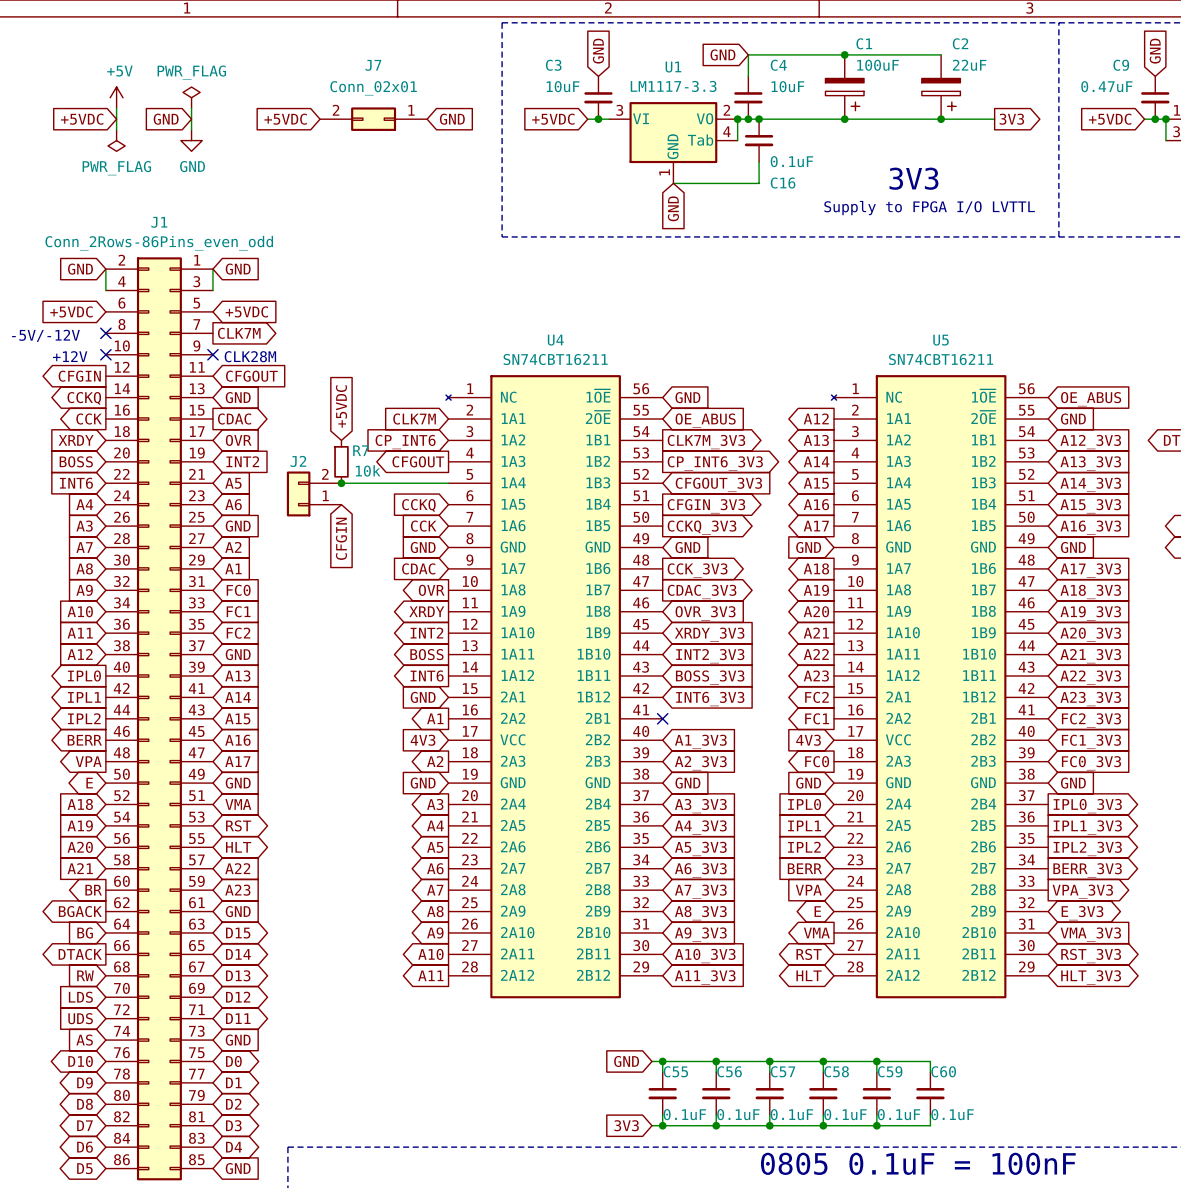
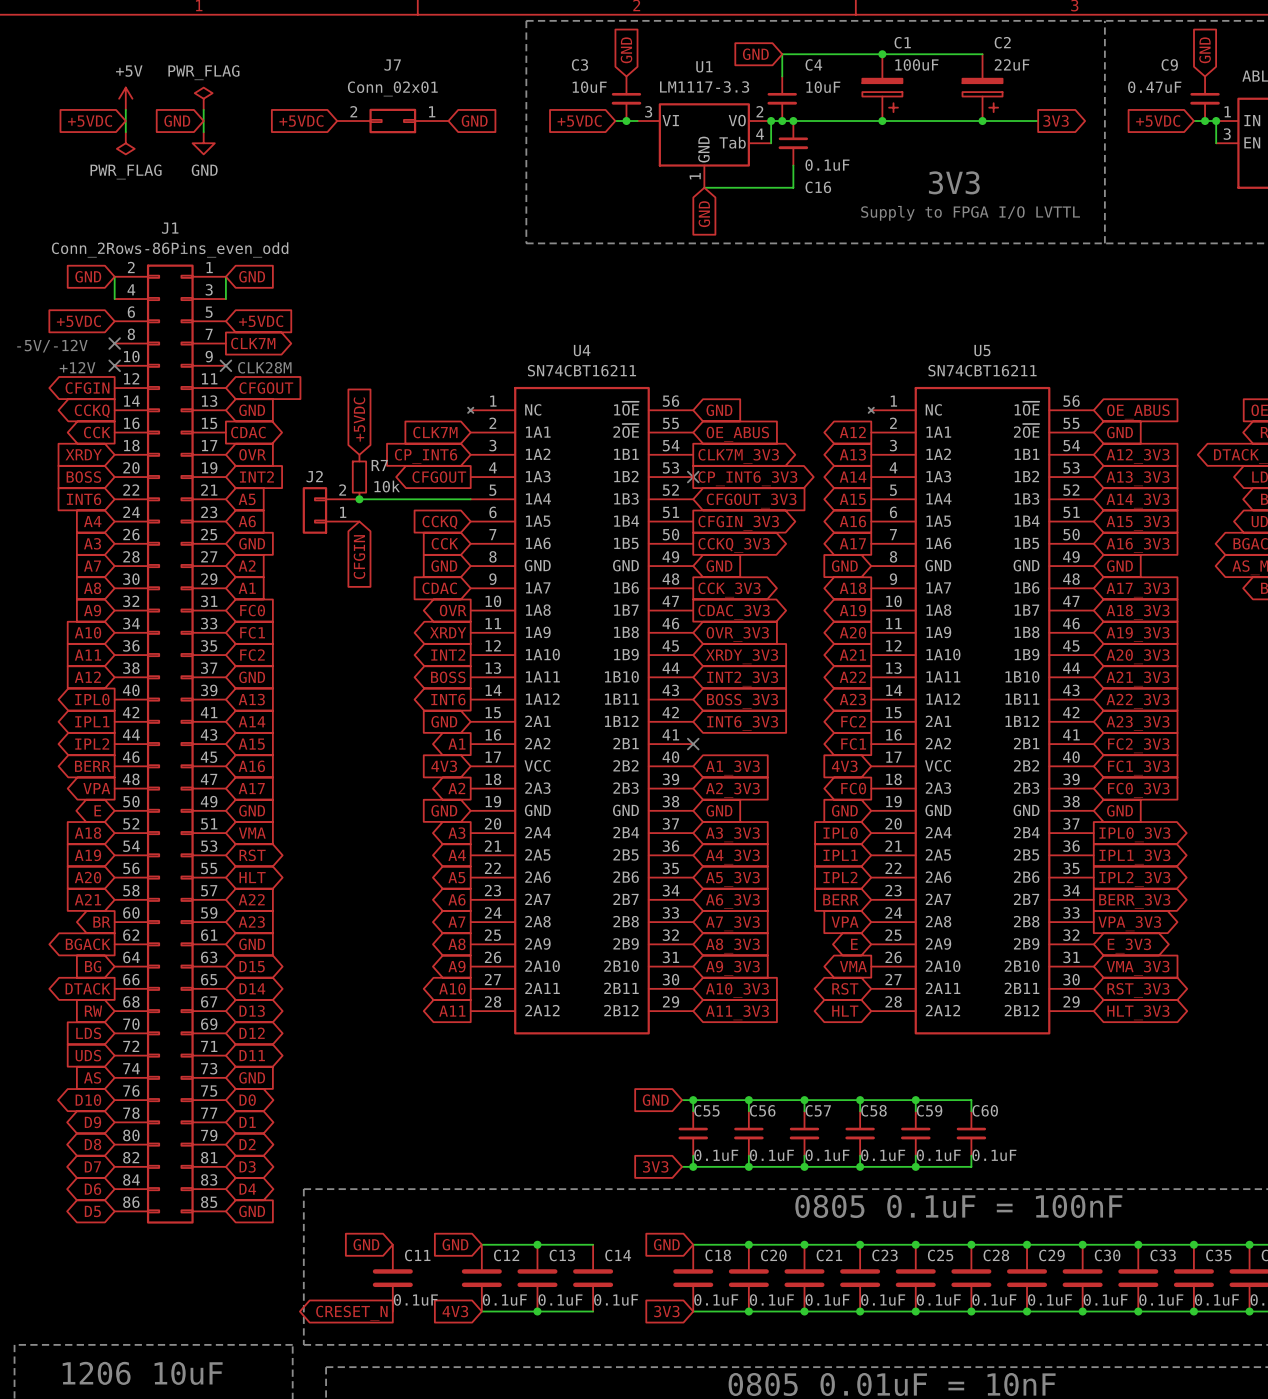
no-connect mark: none -> (693, 477)

